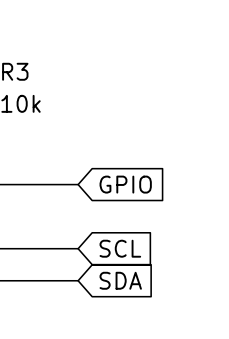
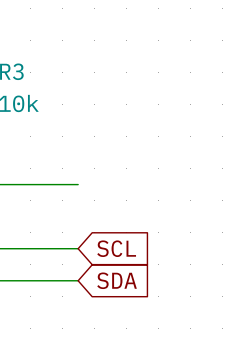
global label: GPIO (125, 184) -> none

